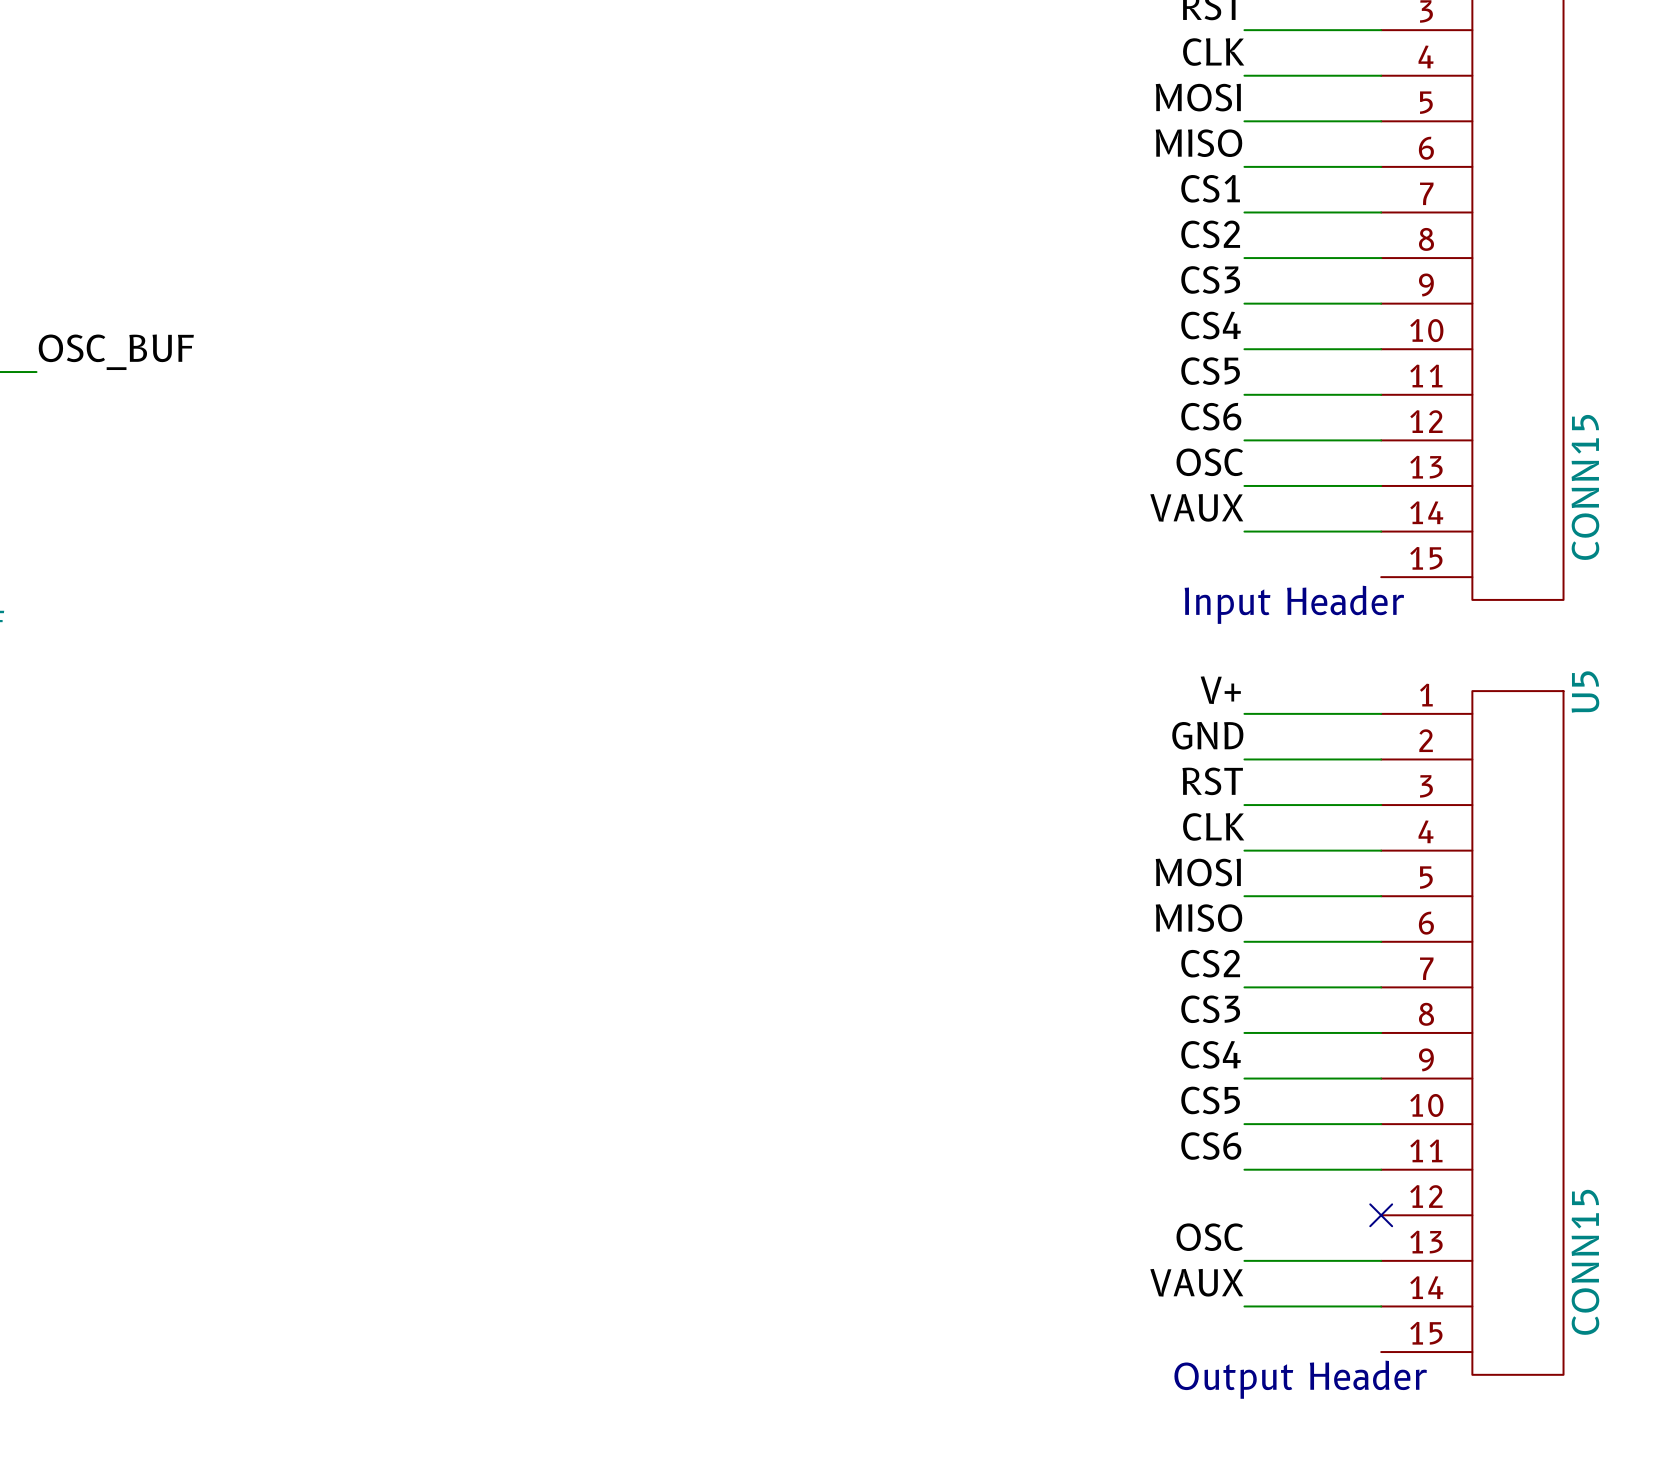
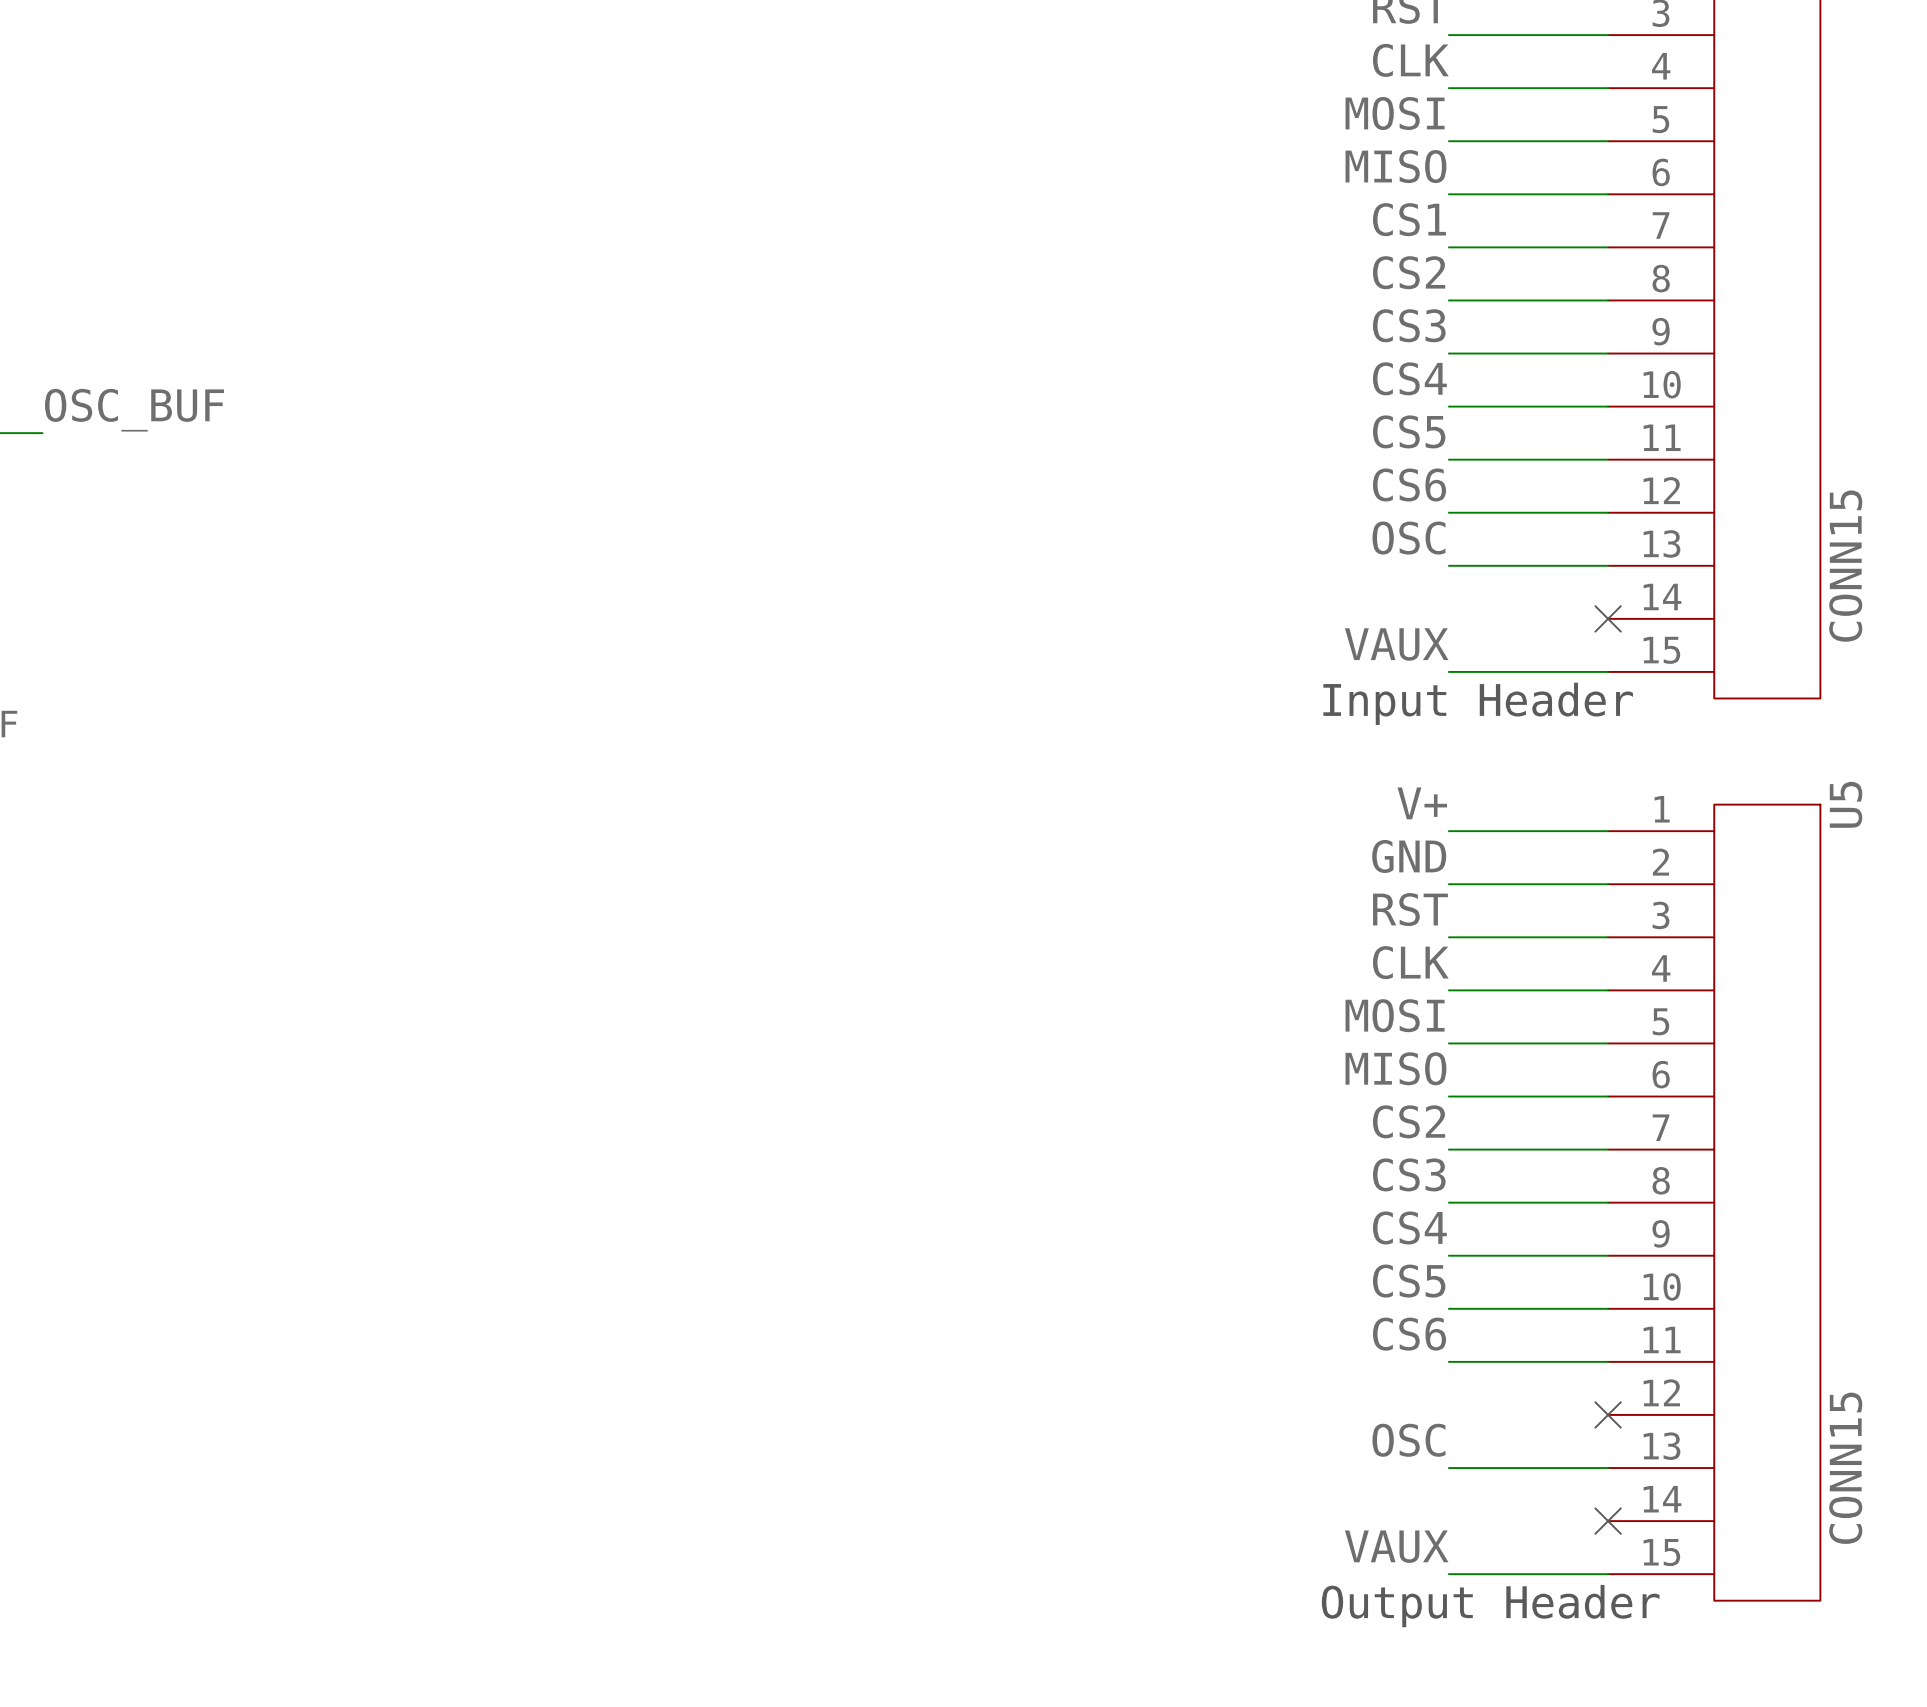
label position: VAUX (1196, 507) -> VAUX (1396, 644)
wire: (1244, 531) (1381, 531) -> (1448, 671) (1608, 671)
no-connect mark: none -> (1608, 618)
label position: VAUX (1196, 1282) -> VAUX (1396, 1546)
wire: (1244, 1306) (1381, 1306) -> (1448, 1574) (1608, 1574)
no-connect mark: none -> (1608, 1521)

